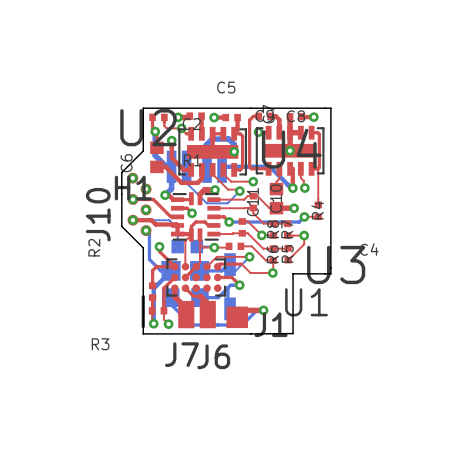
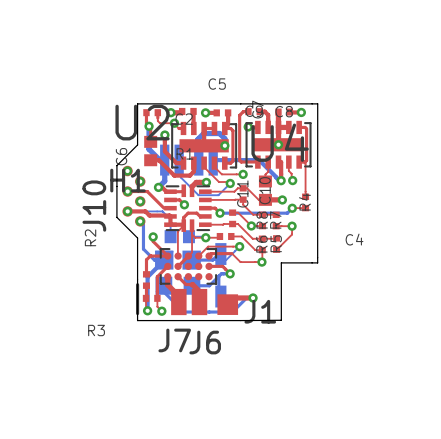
U3 name: U3 (336, 264) -> none
U1 name: U1 (306, 302) -> none

